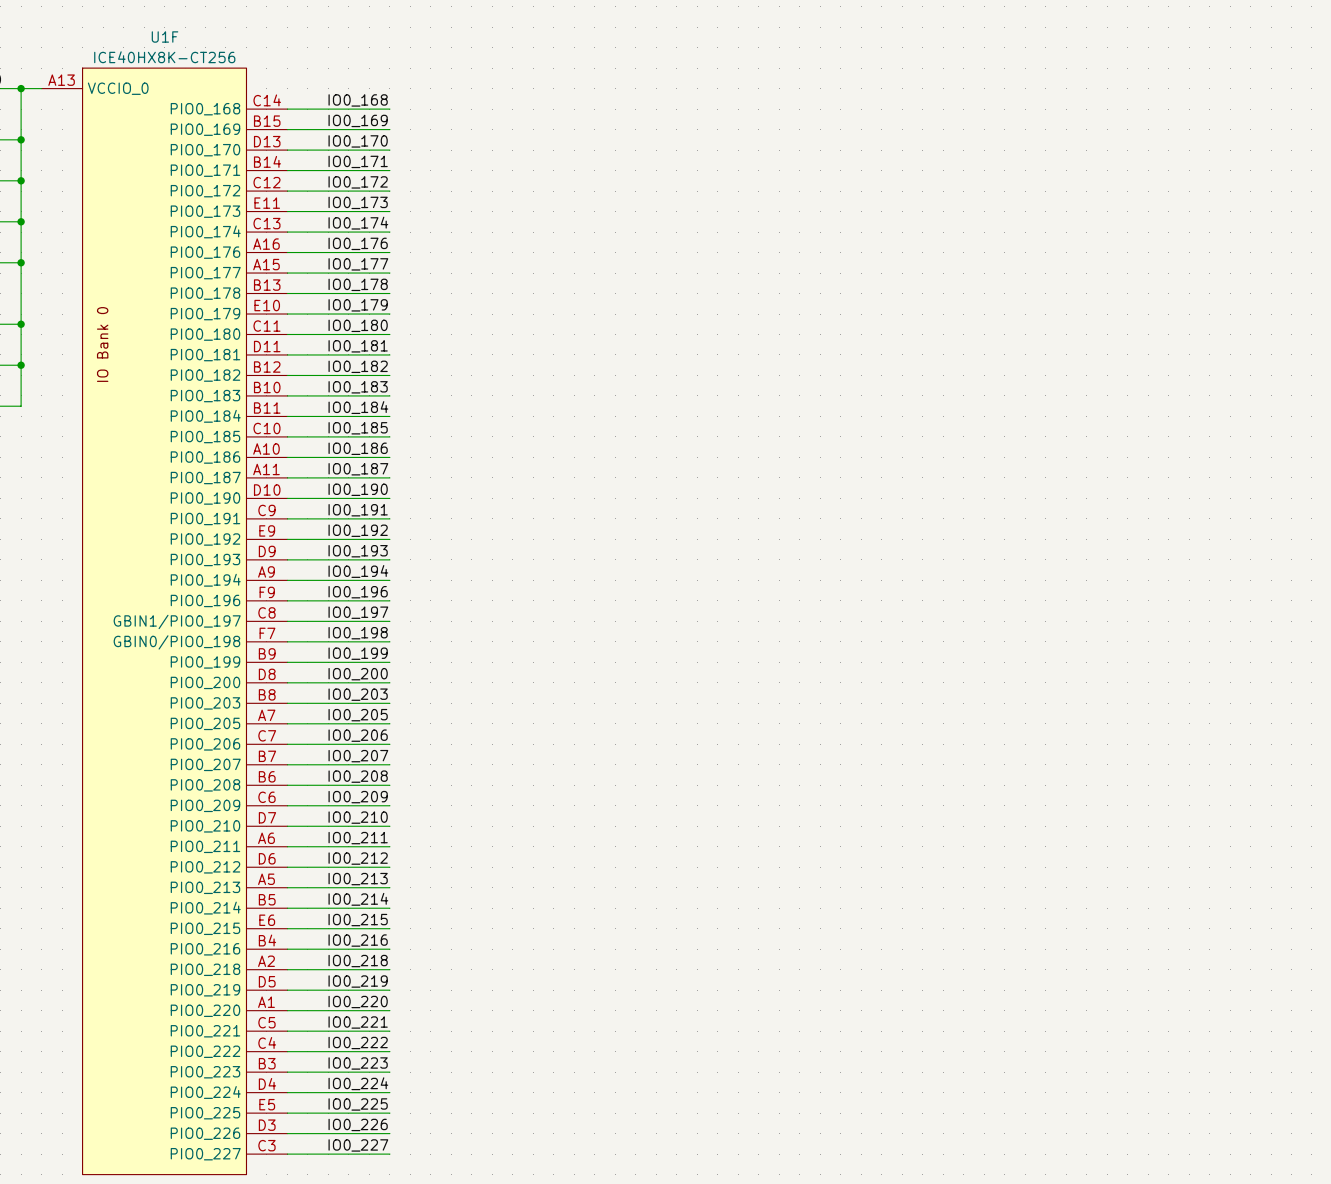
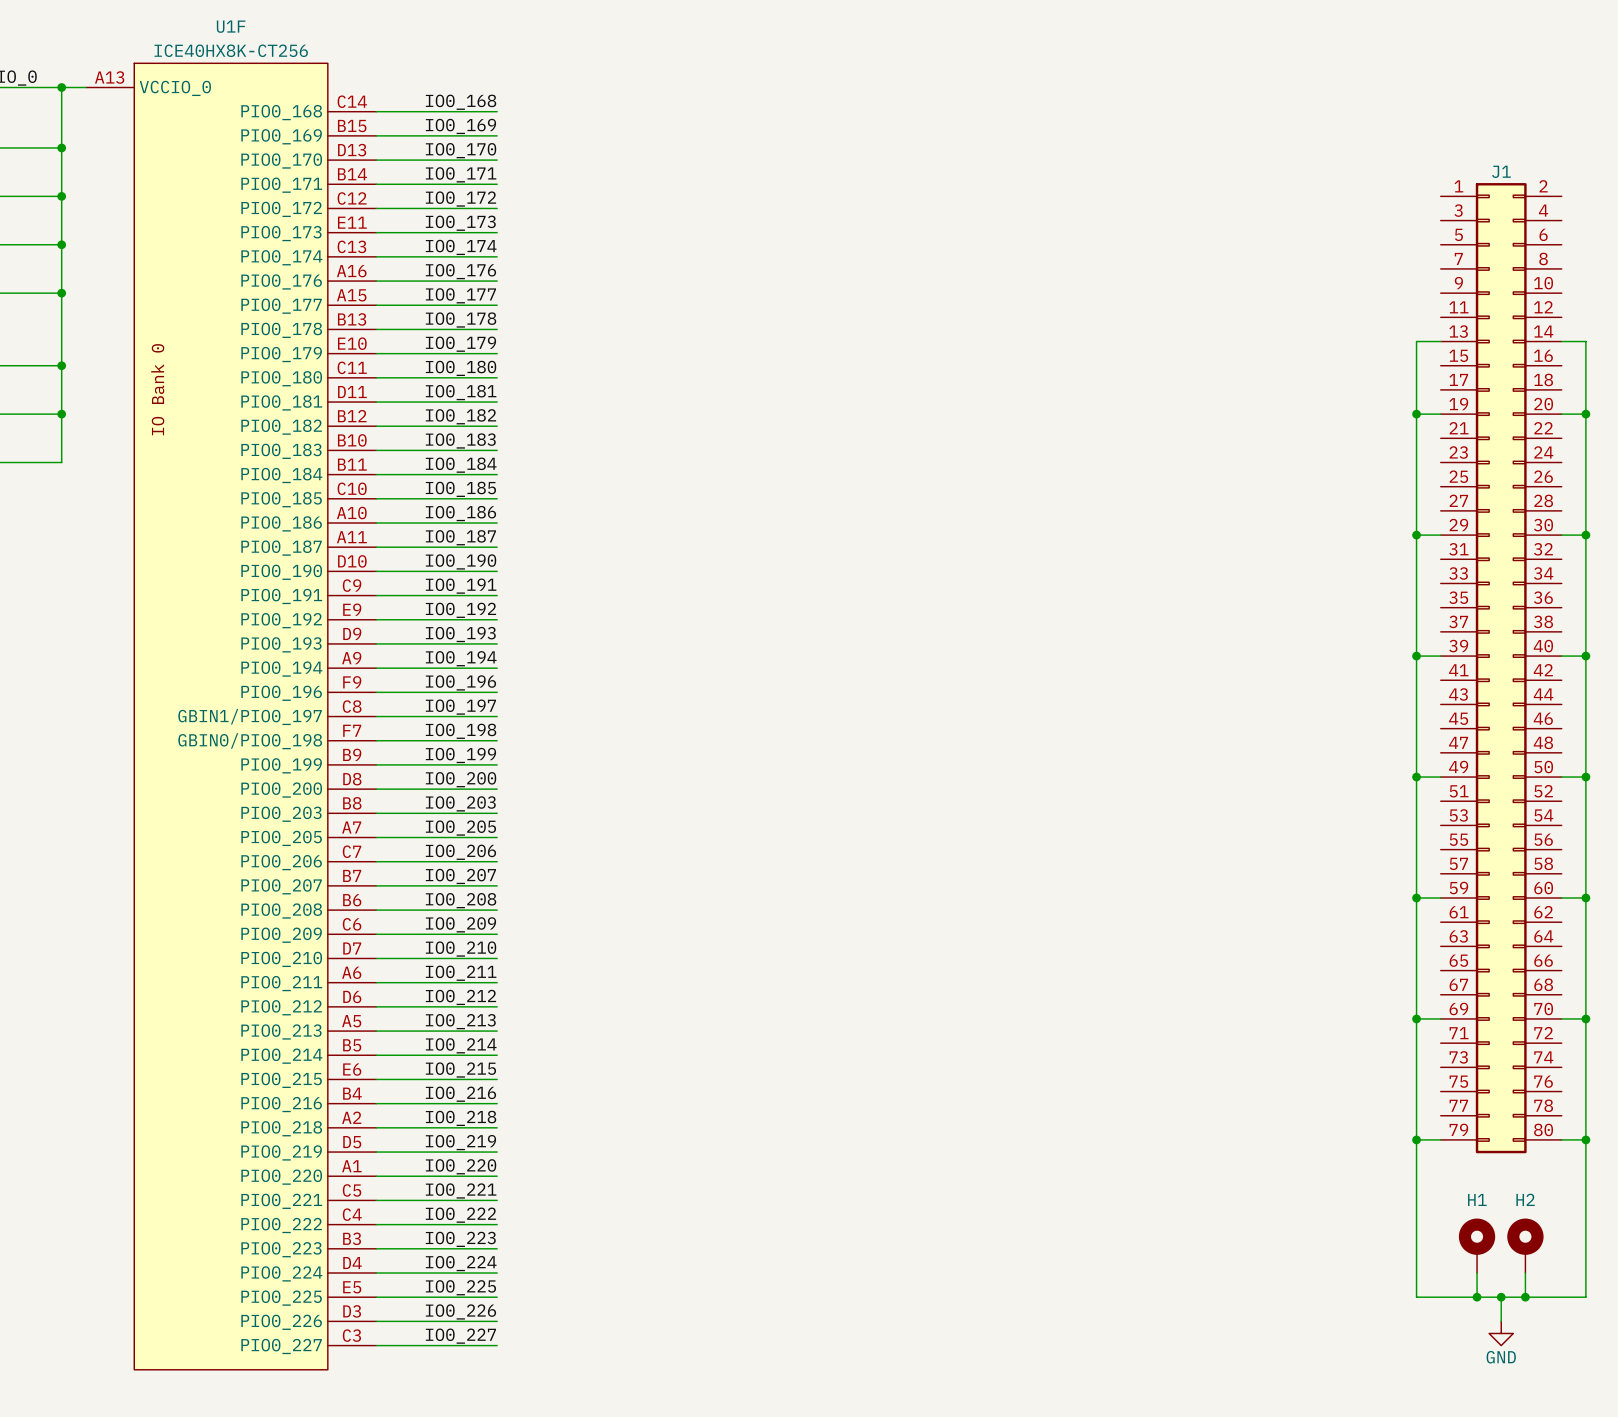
wire: none -> (1440, 341) (1416, 341) (1416, 1297) (1585, 1297) (1585, 341) (1561, 341)
wire: none -> (1416, 414) (1440, 414)
junction: none -> (1416, 414)
wire: none -> (1561, 414) (1585, 414)
junction: none -> (1585, 414)
wire: none -> (1416, 535) (1440, 535)
junction: none -> (1416, 535)
wire: none -> (1561, 535) (1585, 535)
junction: none -> (1585, 535)
wire: none -> (1416, 656) (1440, 656)
junction: none -> (1416, 656)
wire: none -> (1561, 656) (1585, 656)
junction: none -> (1585, 656)
J1: none -> (1501, 668)
wire: none -> (1416, 777) (1440, 777)
junction: none -> (1416, 777)
wire: none -> (1561, 777) (1585, 777)
junction: none -> (1585, 777)
wire: none -> (1416, 897) (1440, 897)
junction: none -> (1416, 897)
wire: none -> (1561, 897) (1585, 897)
junction: none -> (1585, 897)
wire: none -> (1416, 1018) (1440, 1018)
junction: none -> (1416, 1018)
wire: none -> (1561, 1018) (1585, 1018)
junction: none -> (1585, 1018)
wire: none -> (1416, 1139) (1440, 1139)
junction: none -> (1416, 1139)
wire: none -> (1561, 1139) (1585, 1139)
junction: none -> (1585, 1139)
H1: none -> (1477, 1245)
H2: none -> (1525, 1245)
wire: none -> (1477, 1273) (1477, 1297)
wire: none -> (1525, 1273) (1525, 1297)
junction: none -> (1477, 1297)
wire: none -> (1501, 1297) (1501, 1321)
junction: none -> (1501, 1297)
junction: none -> (1525, 1297)
power symbol: none -> GND (1501, 1333)

